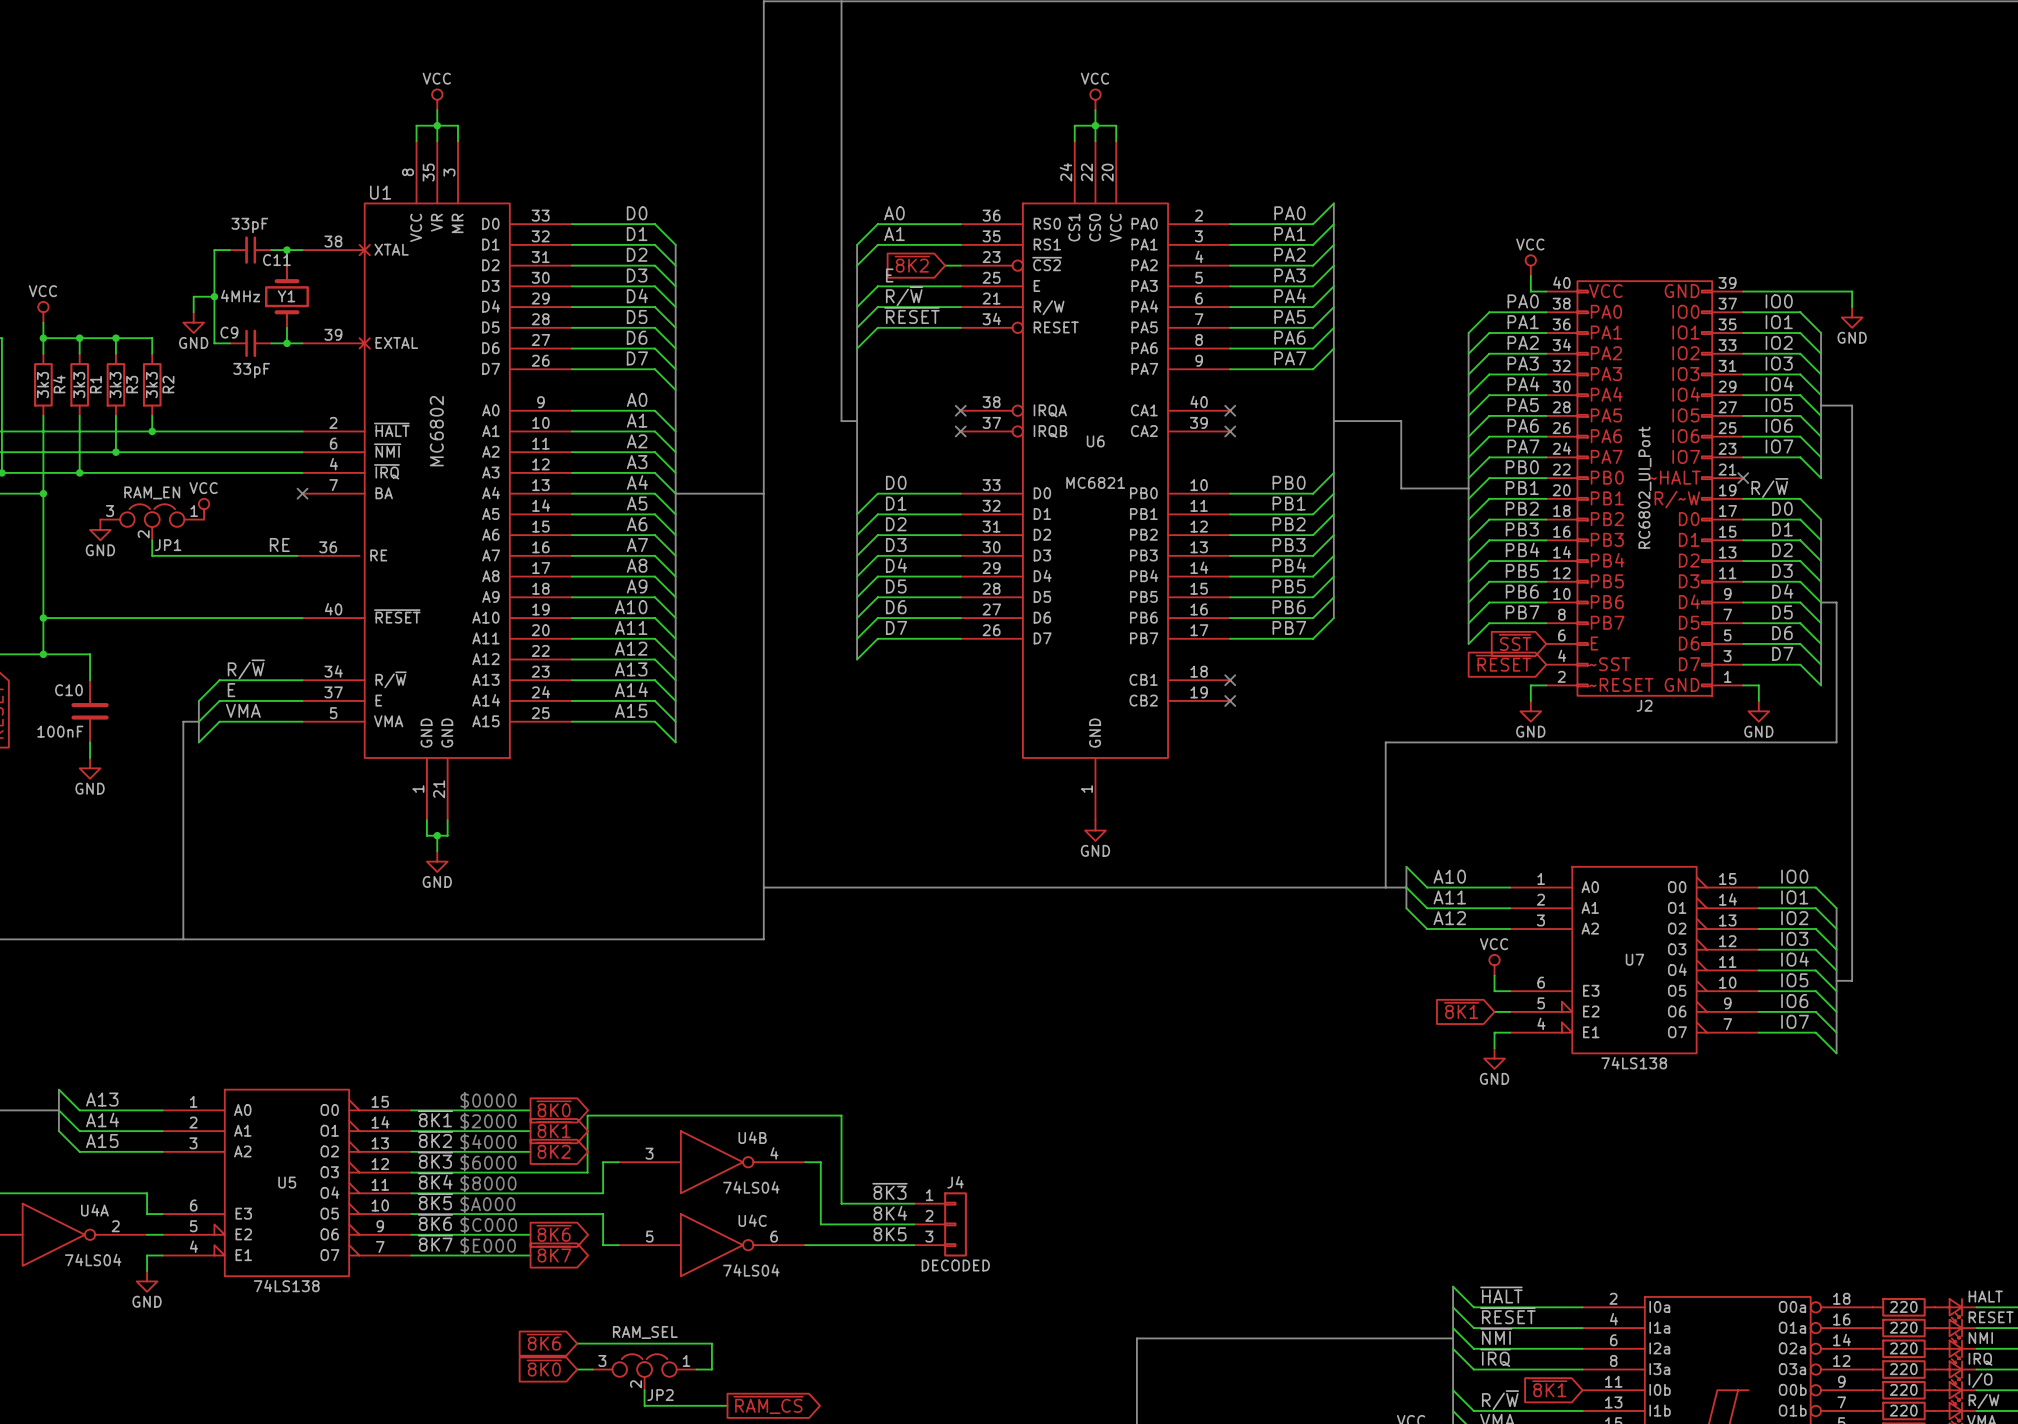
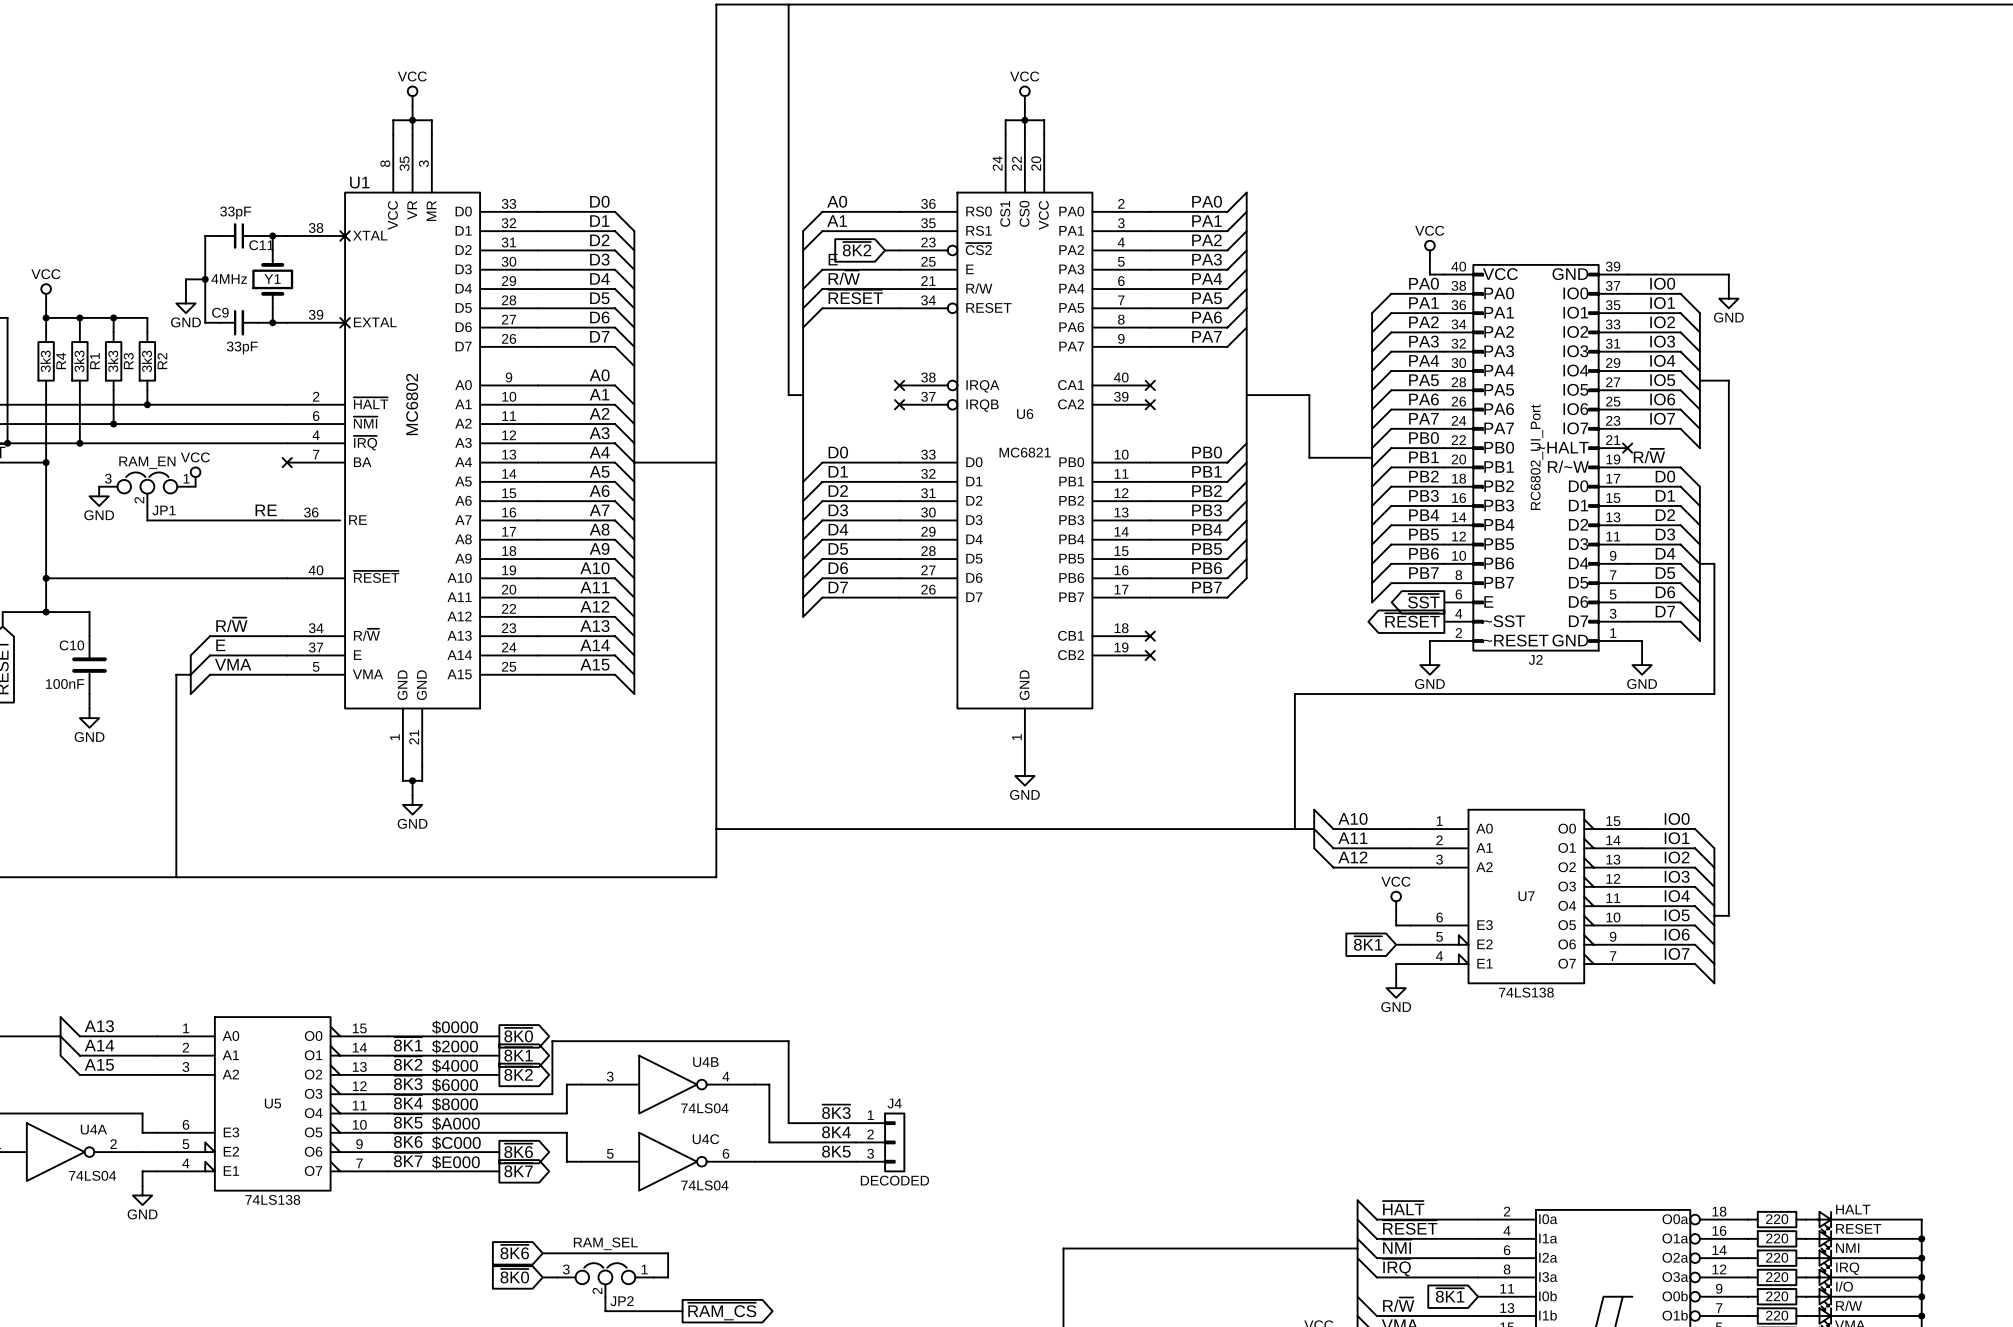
global label shape: input (1514, 642) -> output (1423, 601)
global label shape: input (1503, 663) -> output (1412, 620)

